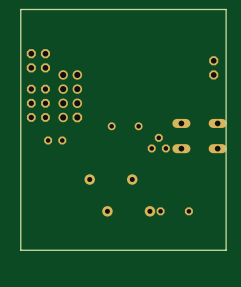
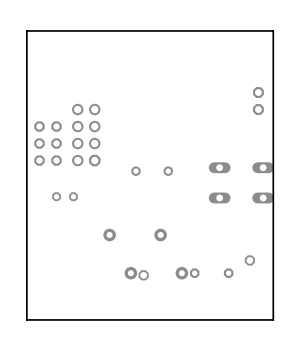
part: (38, 60) -> none
part: (55, 140) -> none
part: (158, 143) -> none
part: none -> (64, 196)
part: none -> (249, 260)
part: none -> (143, 275)

